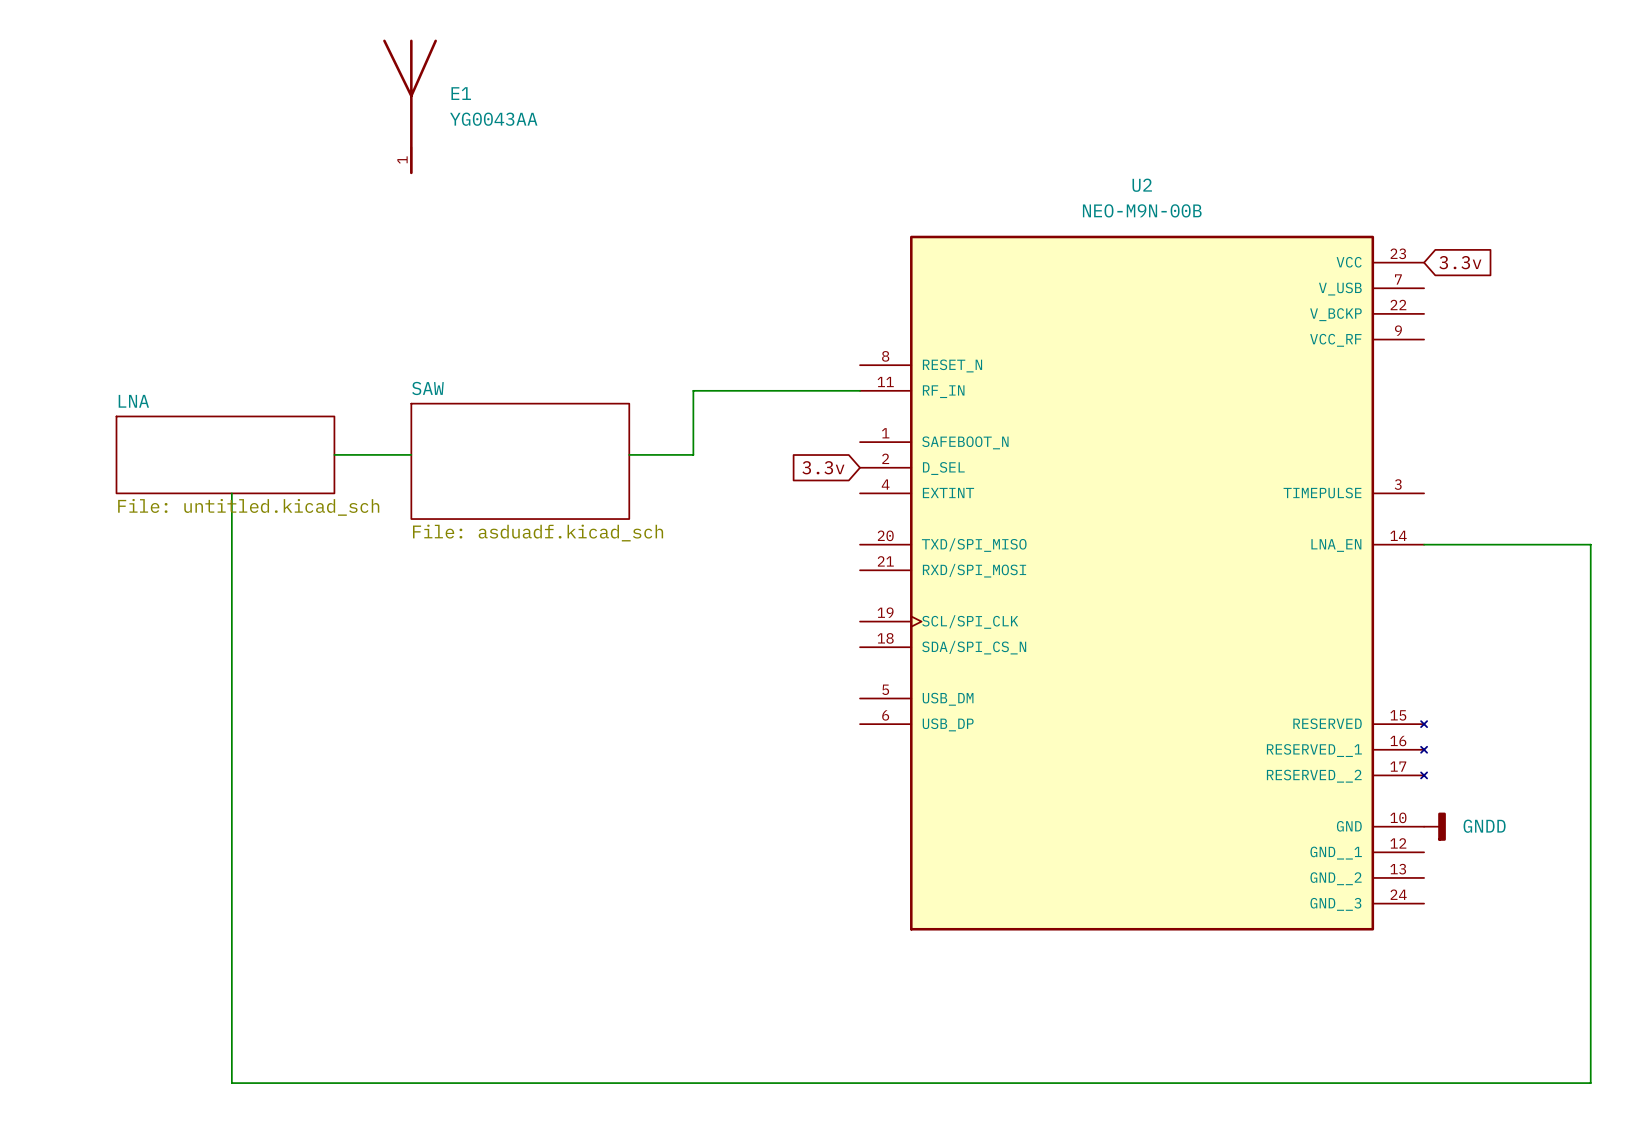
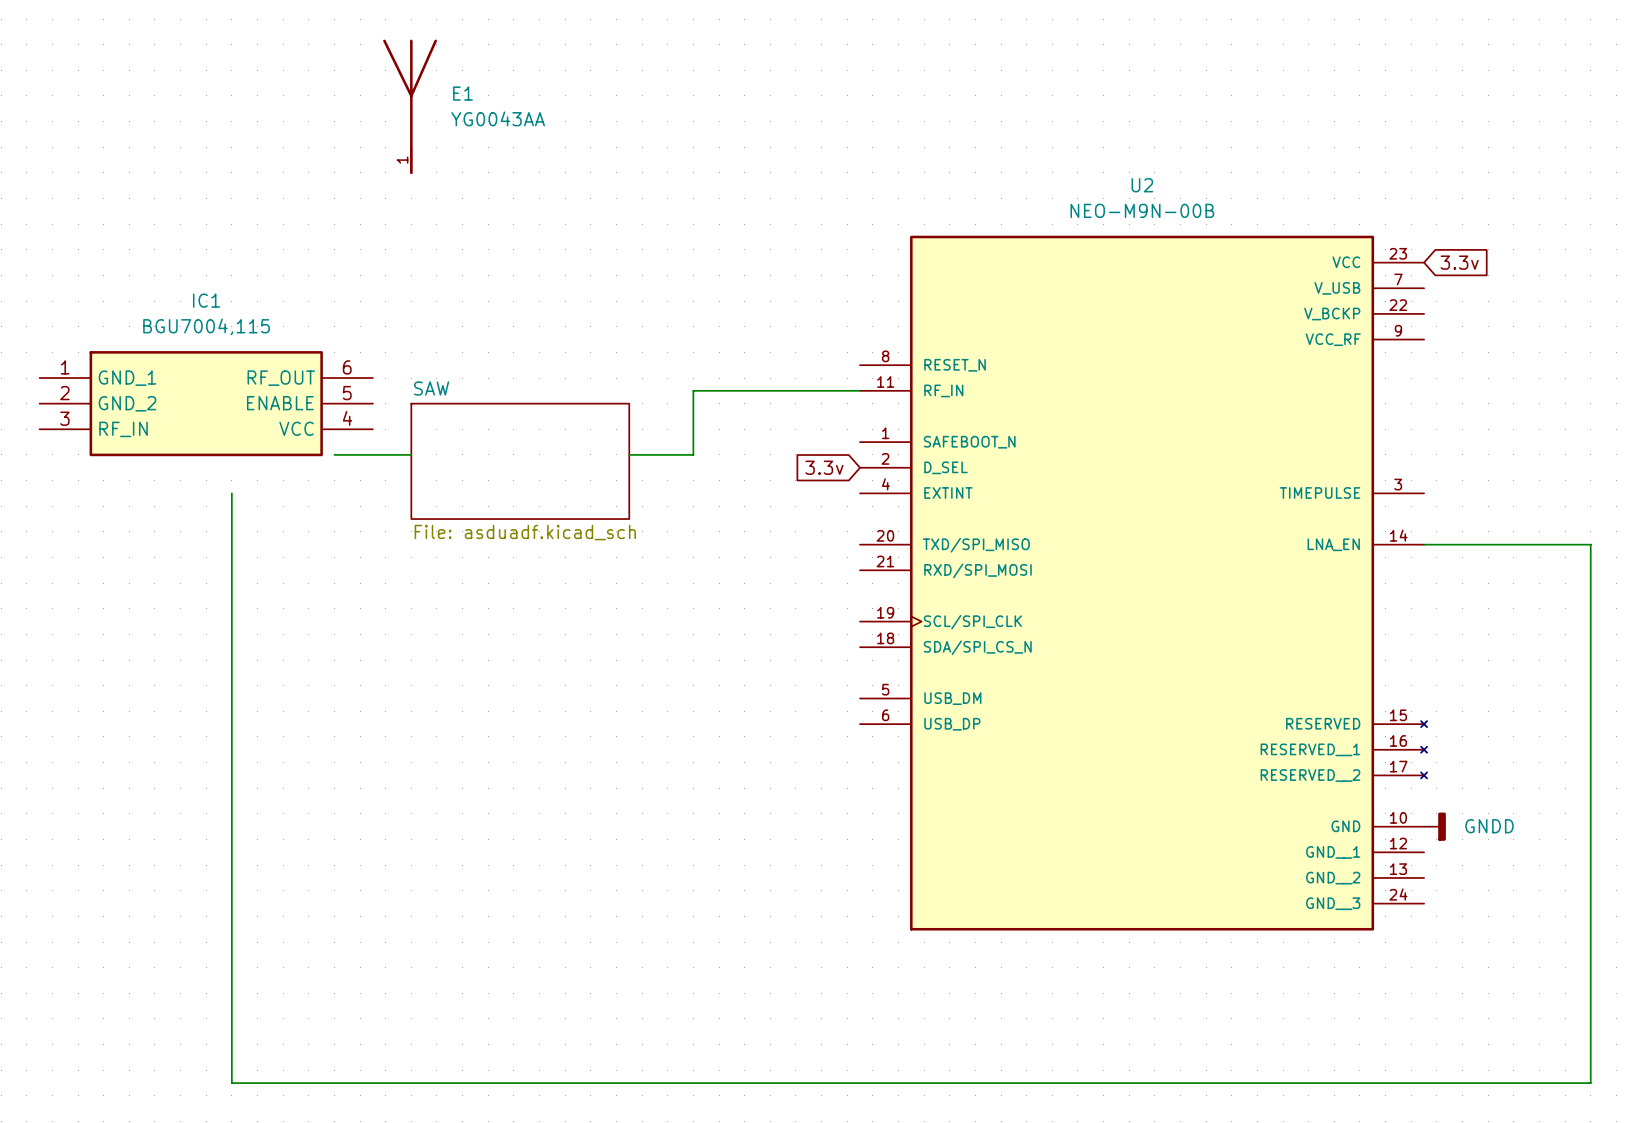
IC1: none -> BGU7004,115 (206, 403)
sheet LNA: File: untitled.kicad_sch (225, 454) -> none

